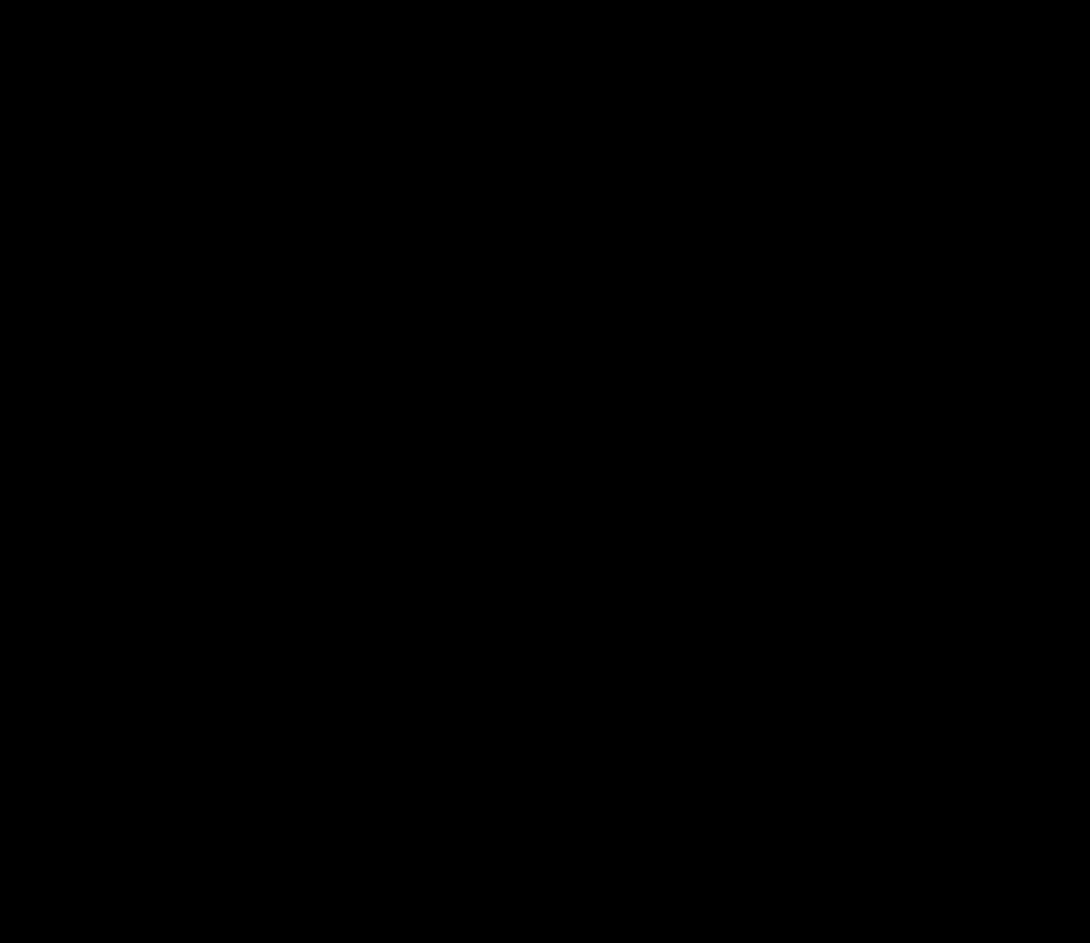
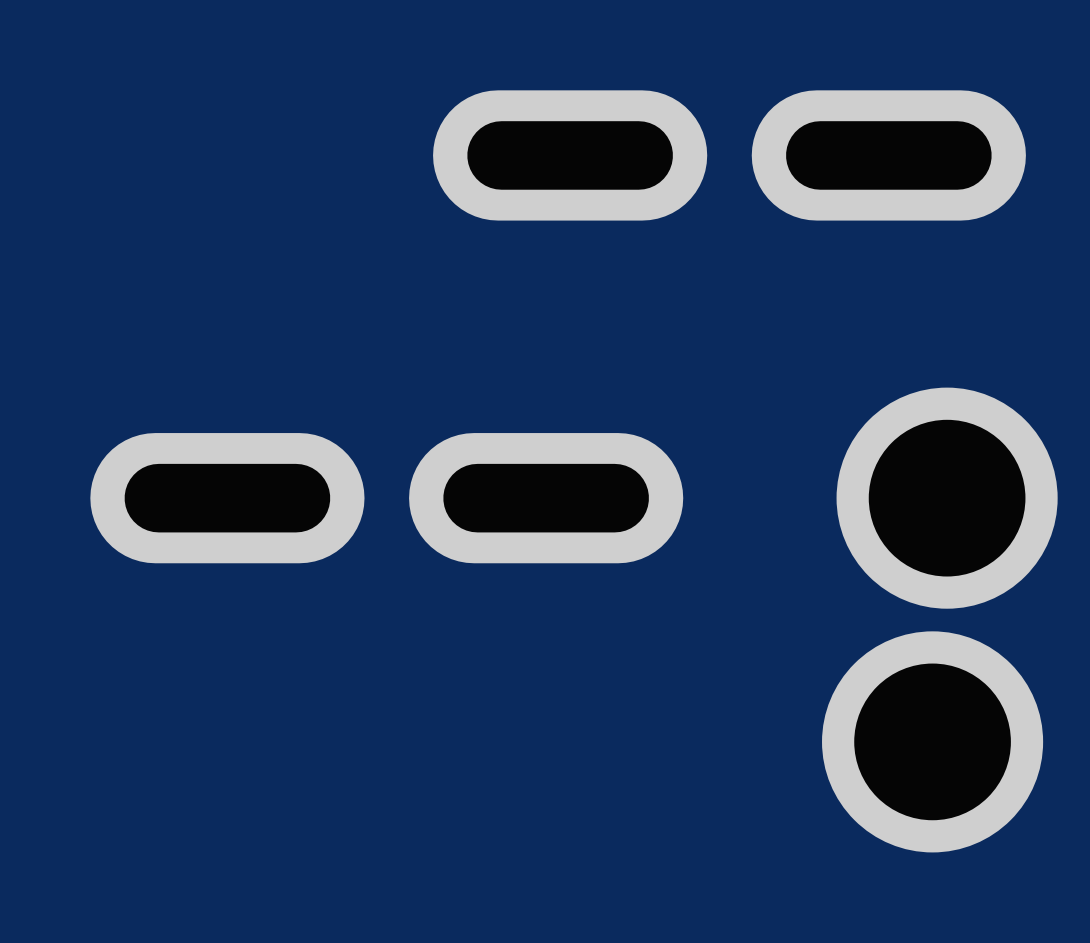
part: none -> (729, 155)
part: none -> (386, 498)
part: none -> (939, 620)

